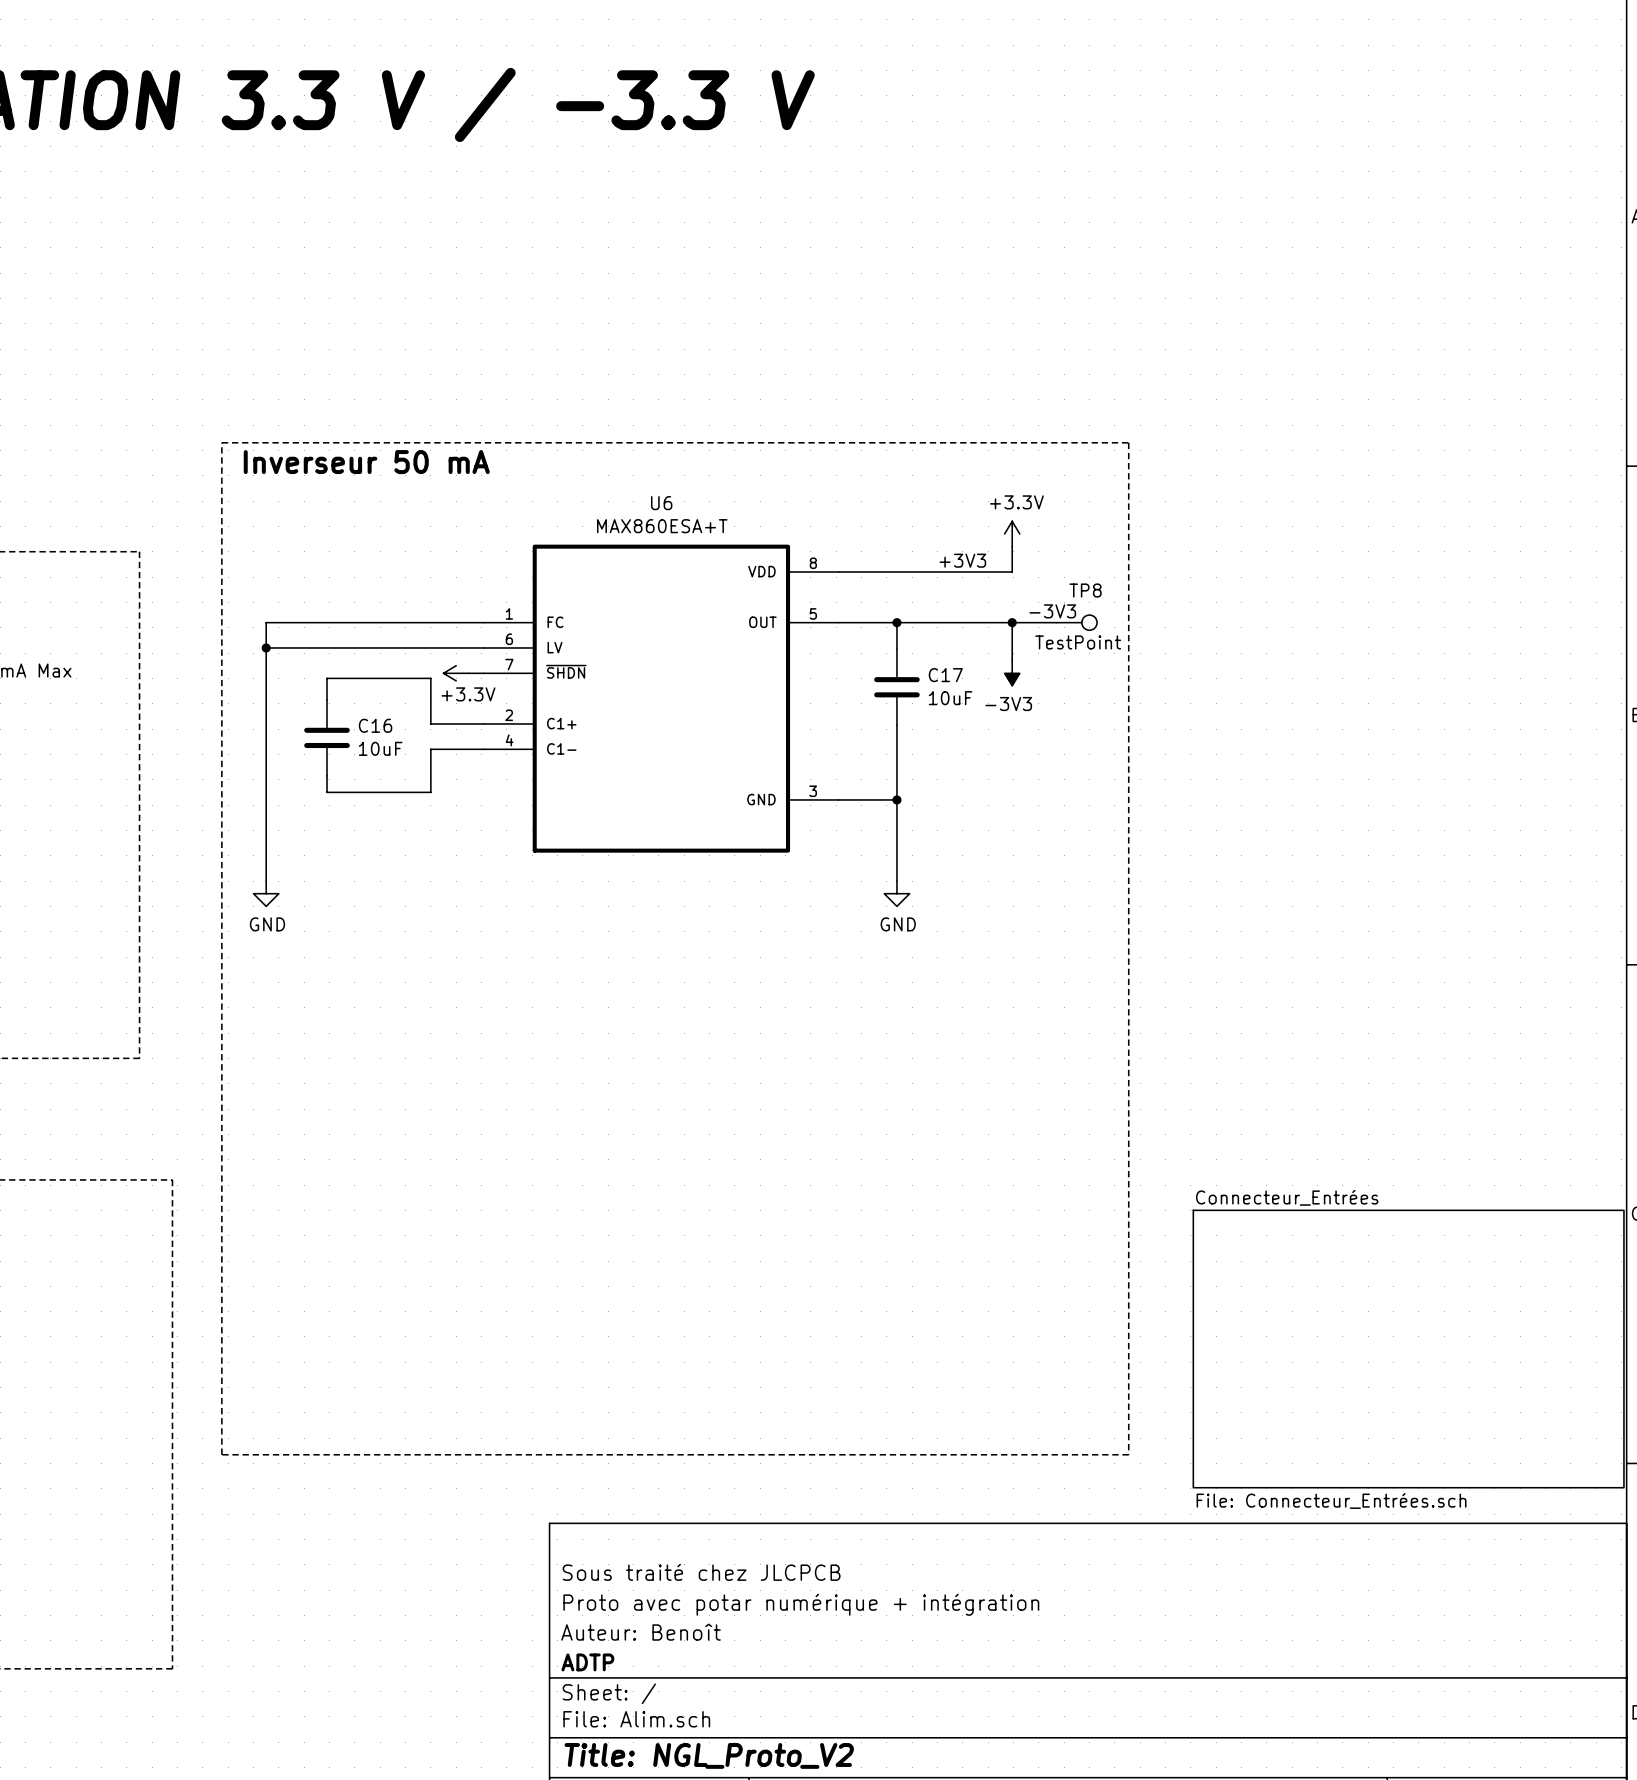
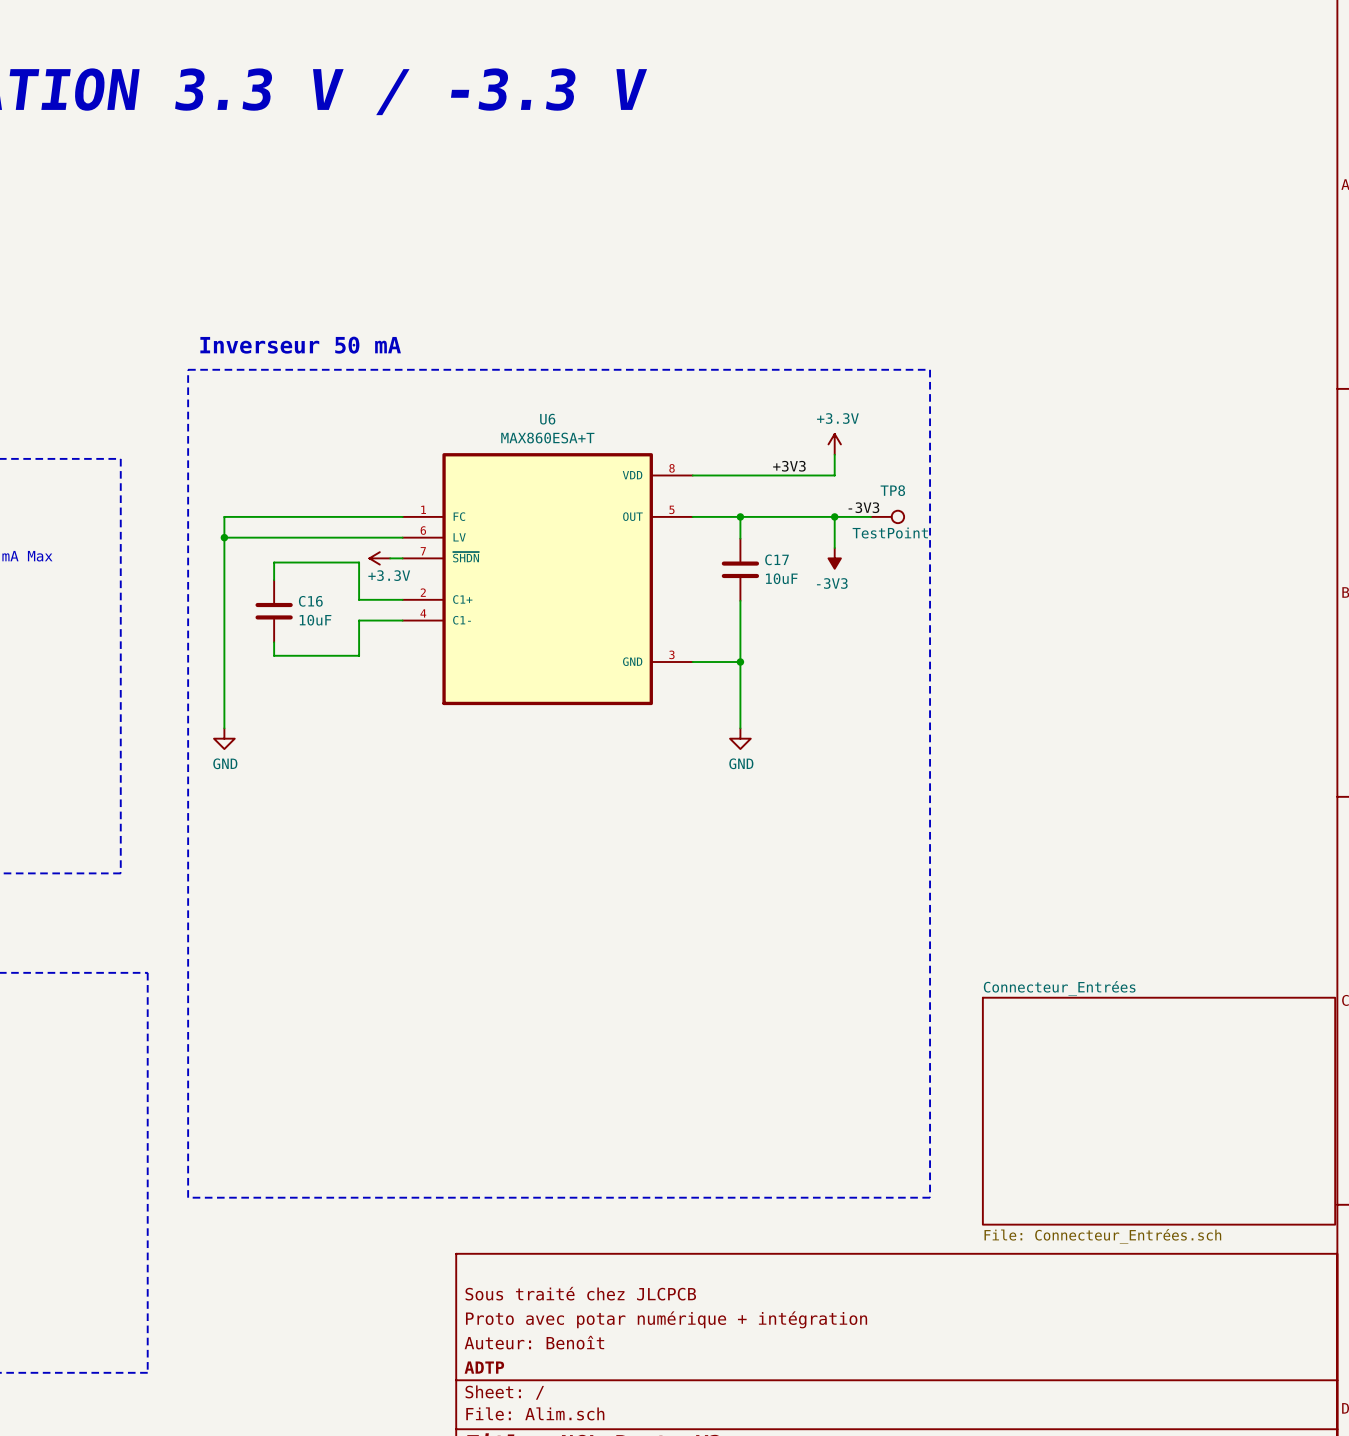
text position: Inverseur 50 mA (366, 462) -> Inverseur 50 mA (300, 345)

